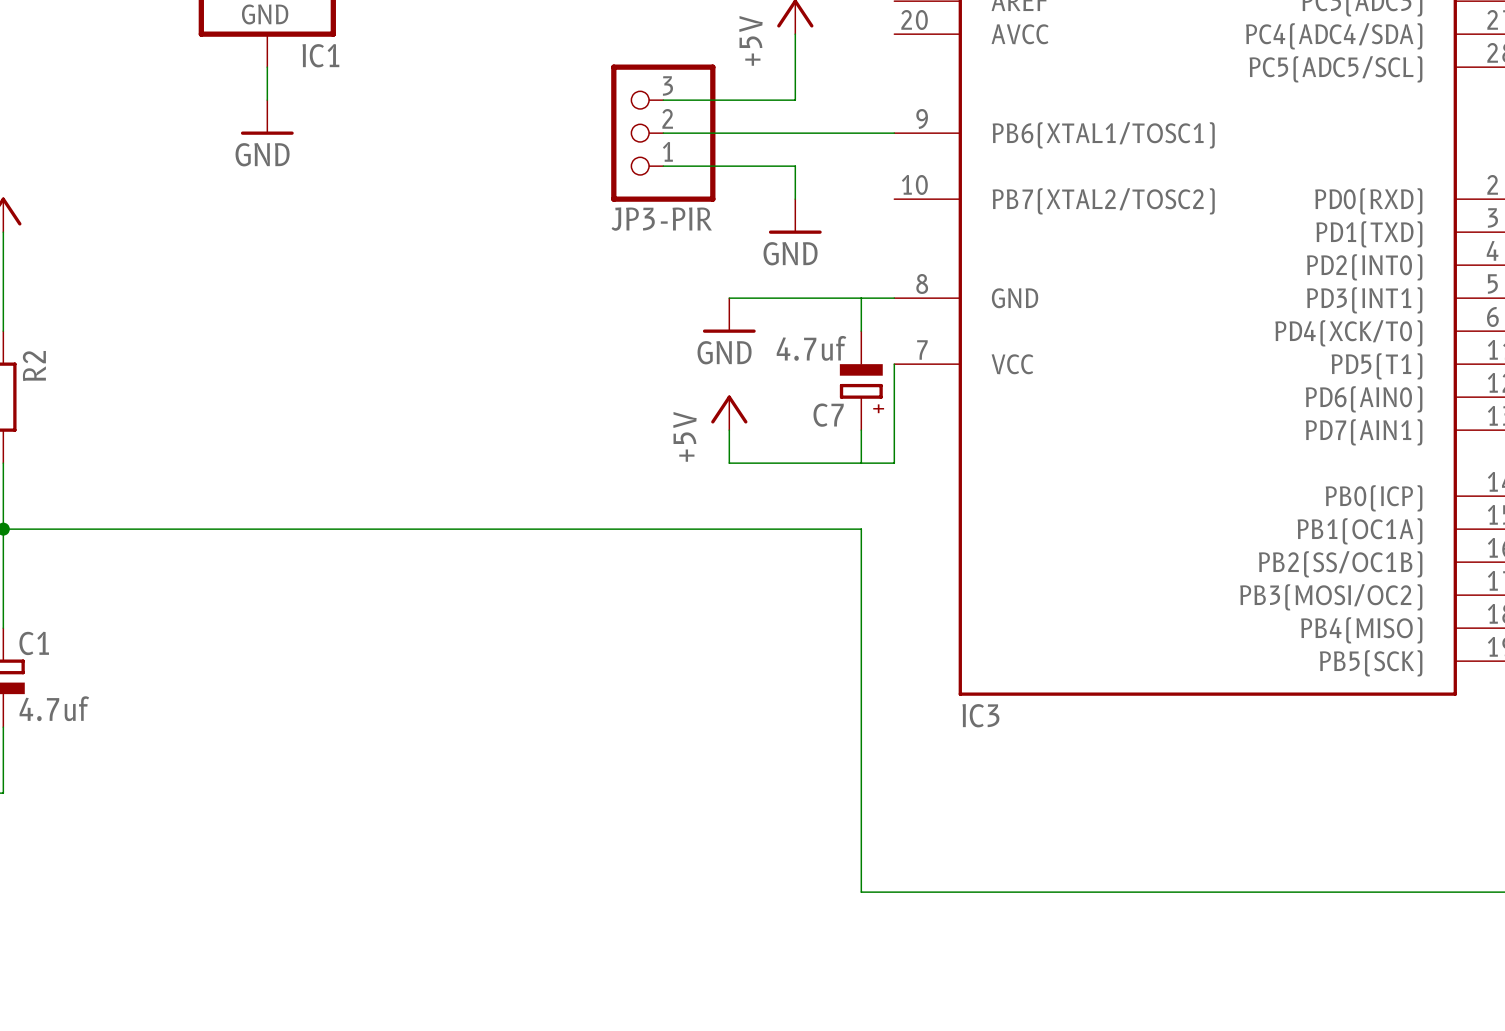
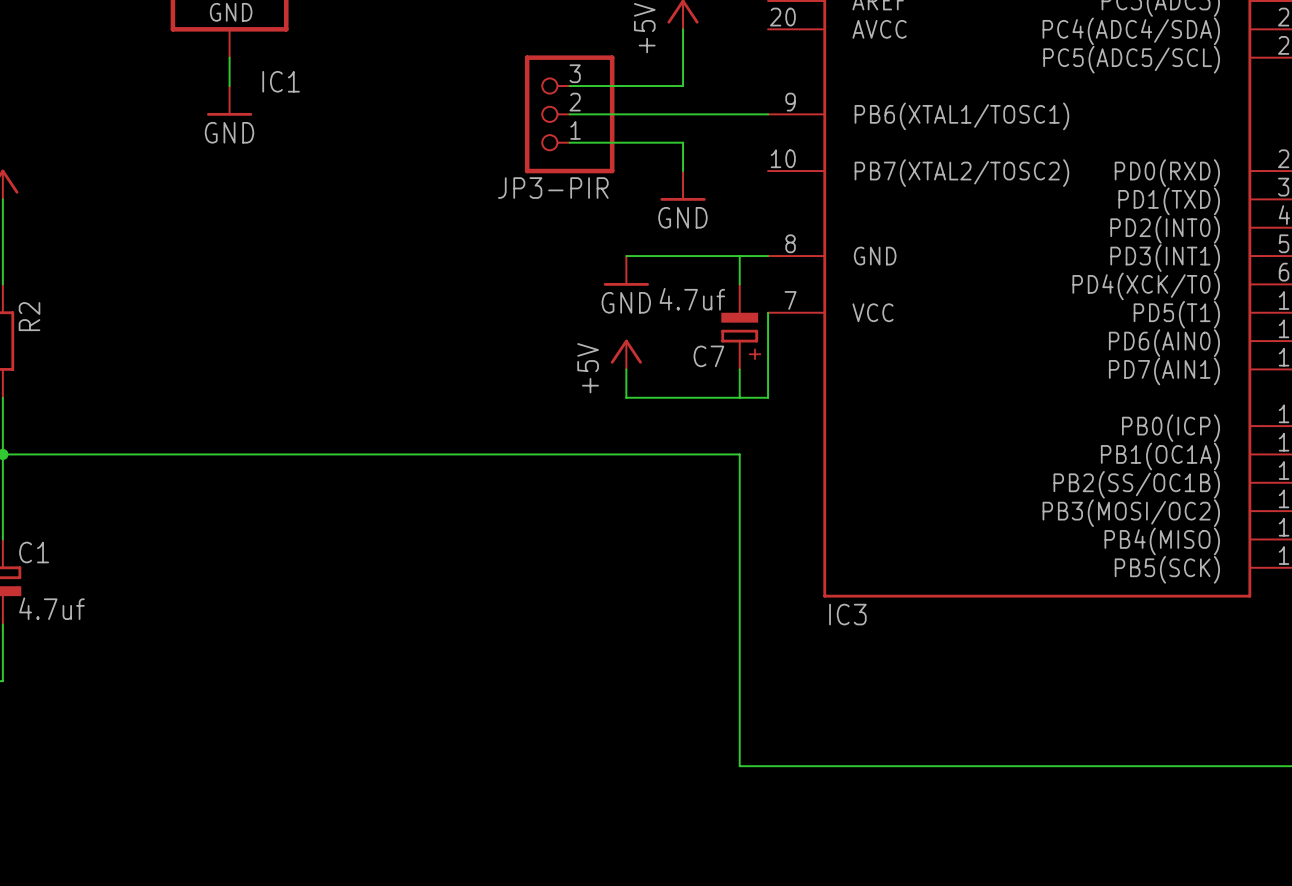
IC1 name position: IC1 (320, 55) -> IC1 (281, 81)

